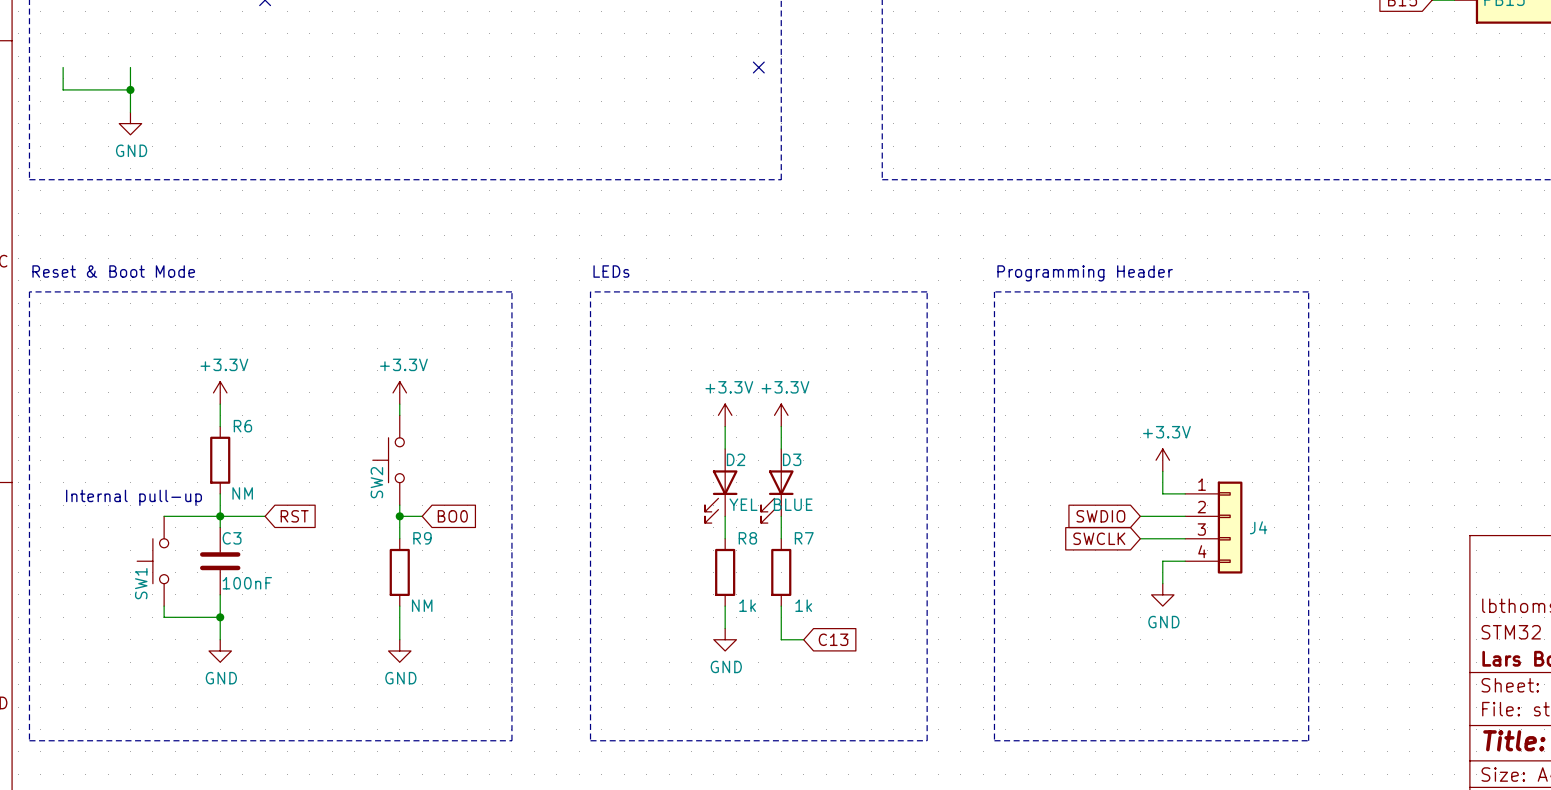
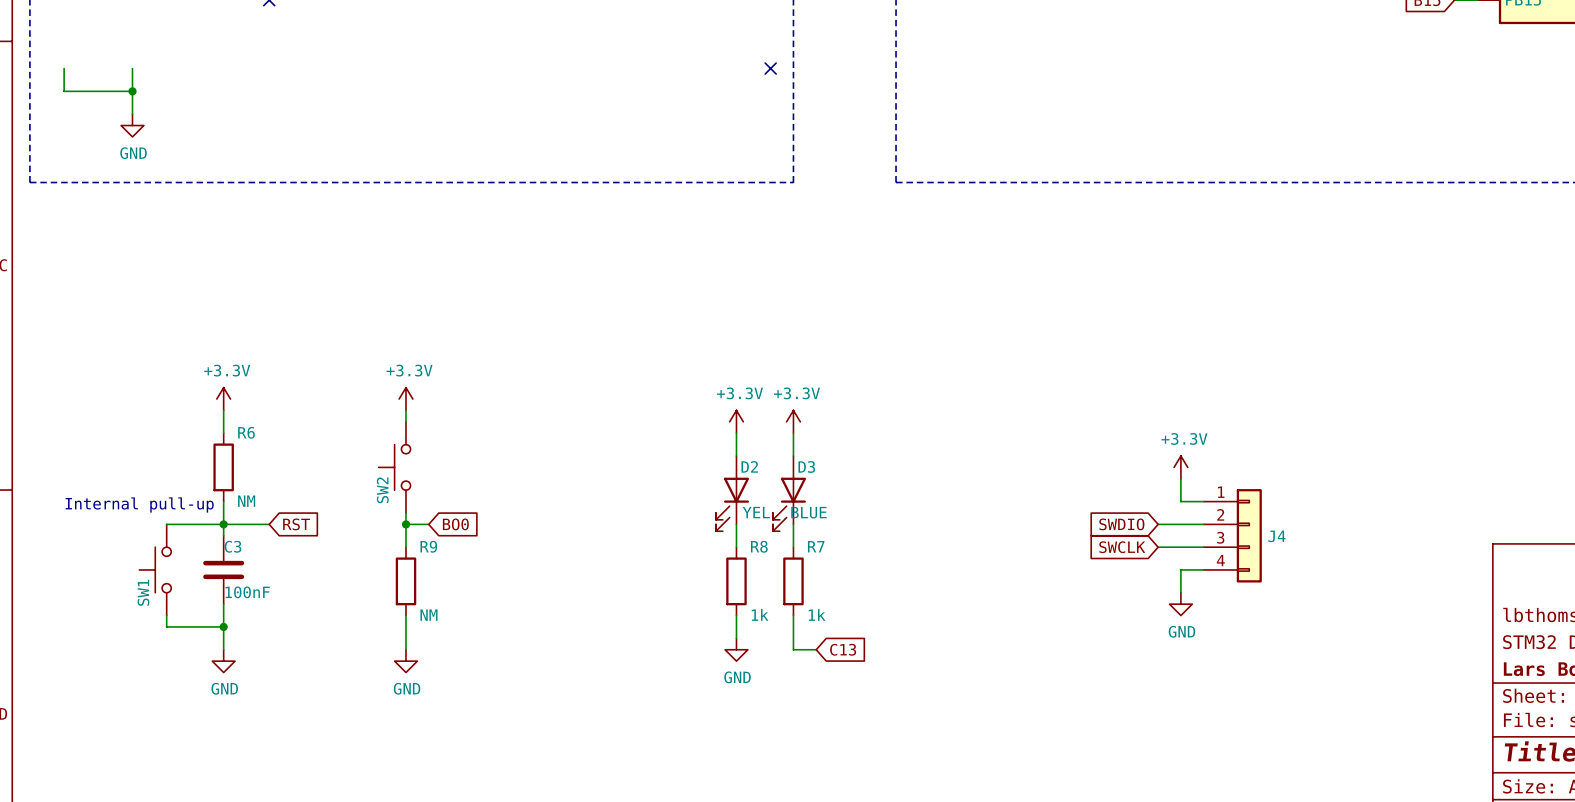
text: Reset & Boot Mode (113, 271) -> none
text: LEDs (611, 271) -> none
text: Programming Header (1085, 273) -> none
line: (29, 291) (511, 291) (511, 740) (29, 740) (29, 291) -> none
line: (590, 291) (927, 291) (927, 740) (590, 740) (590, 291) -> none
line: (994, 291) (1308, 291) (1308, 740) (994, 740) (994, 291) -> none

